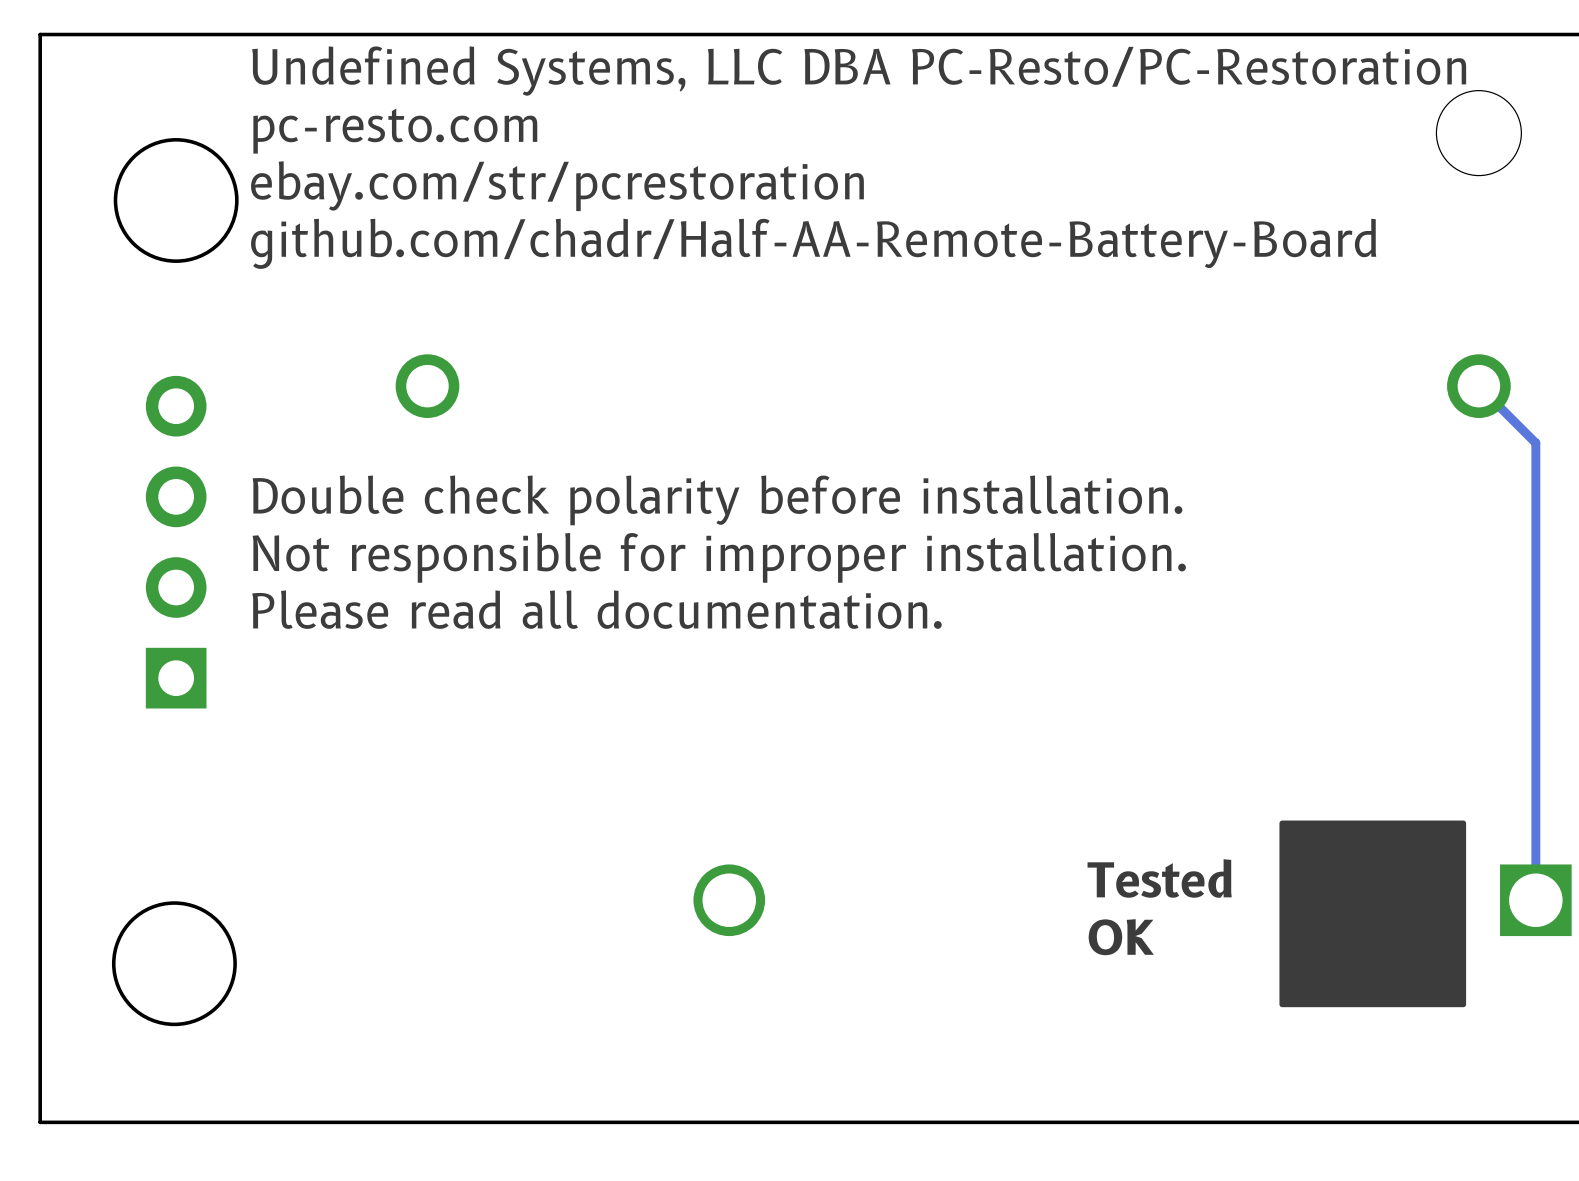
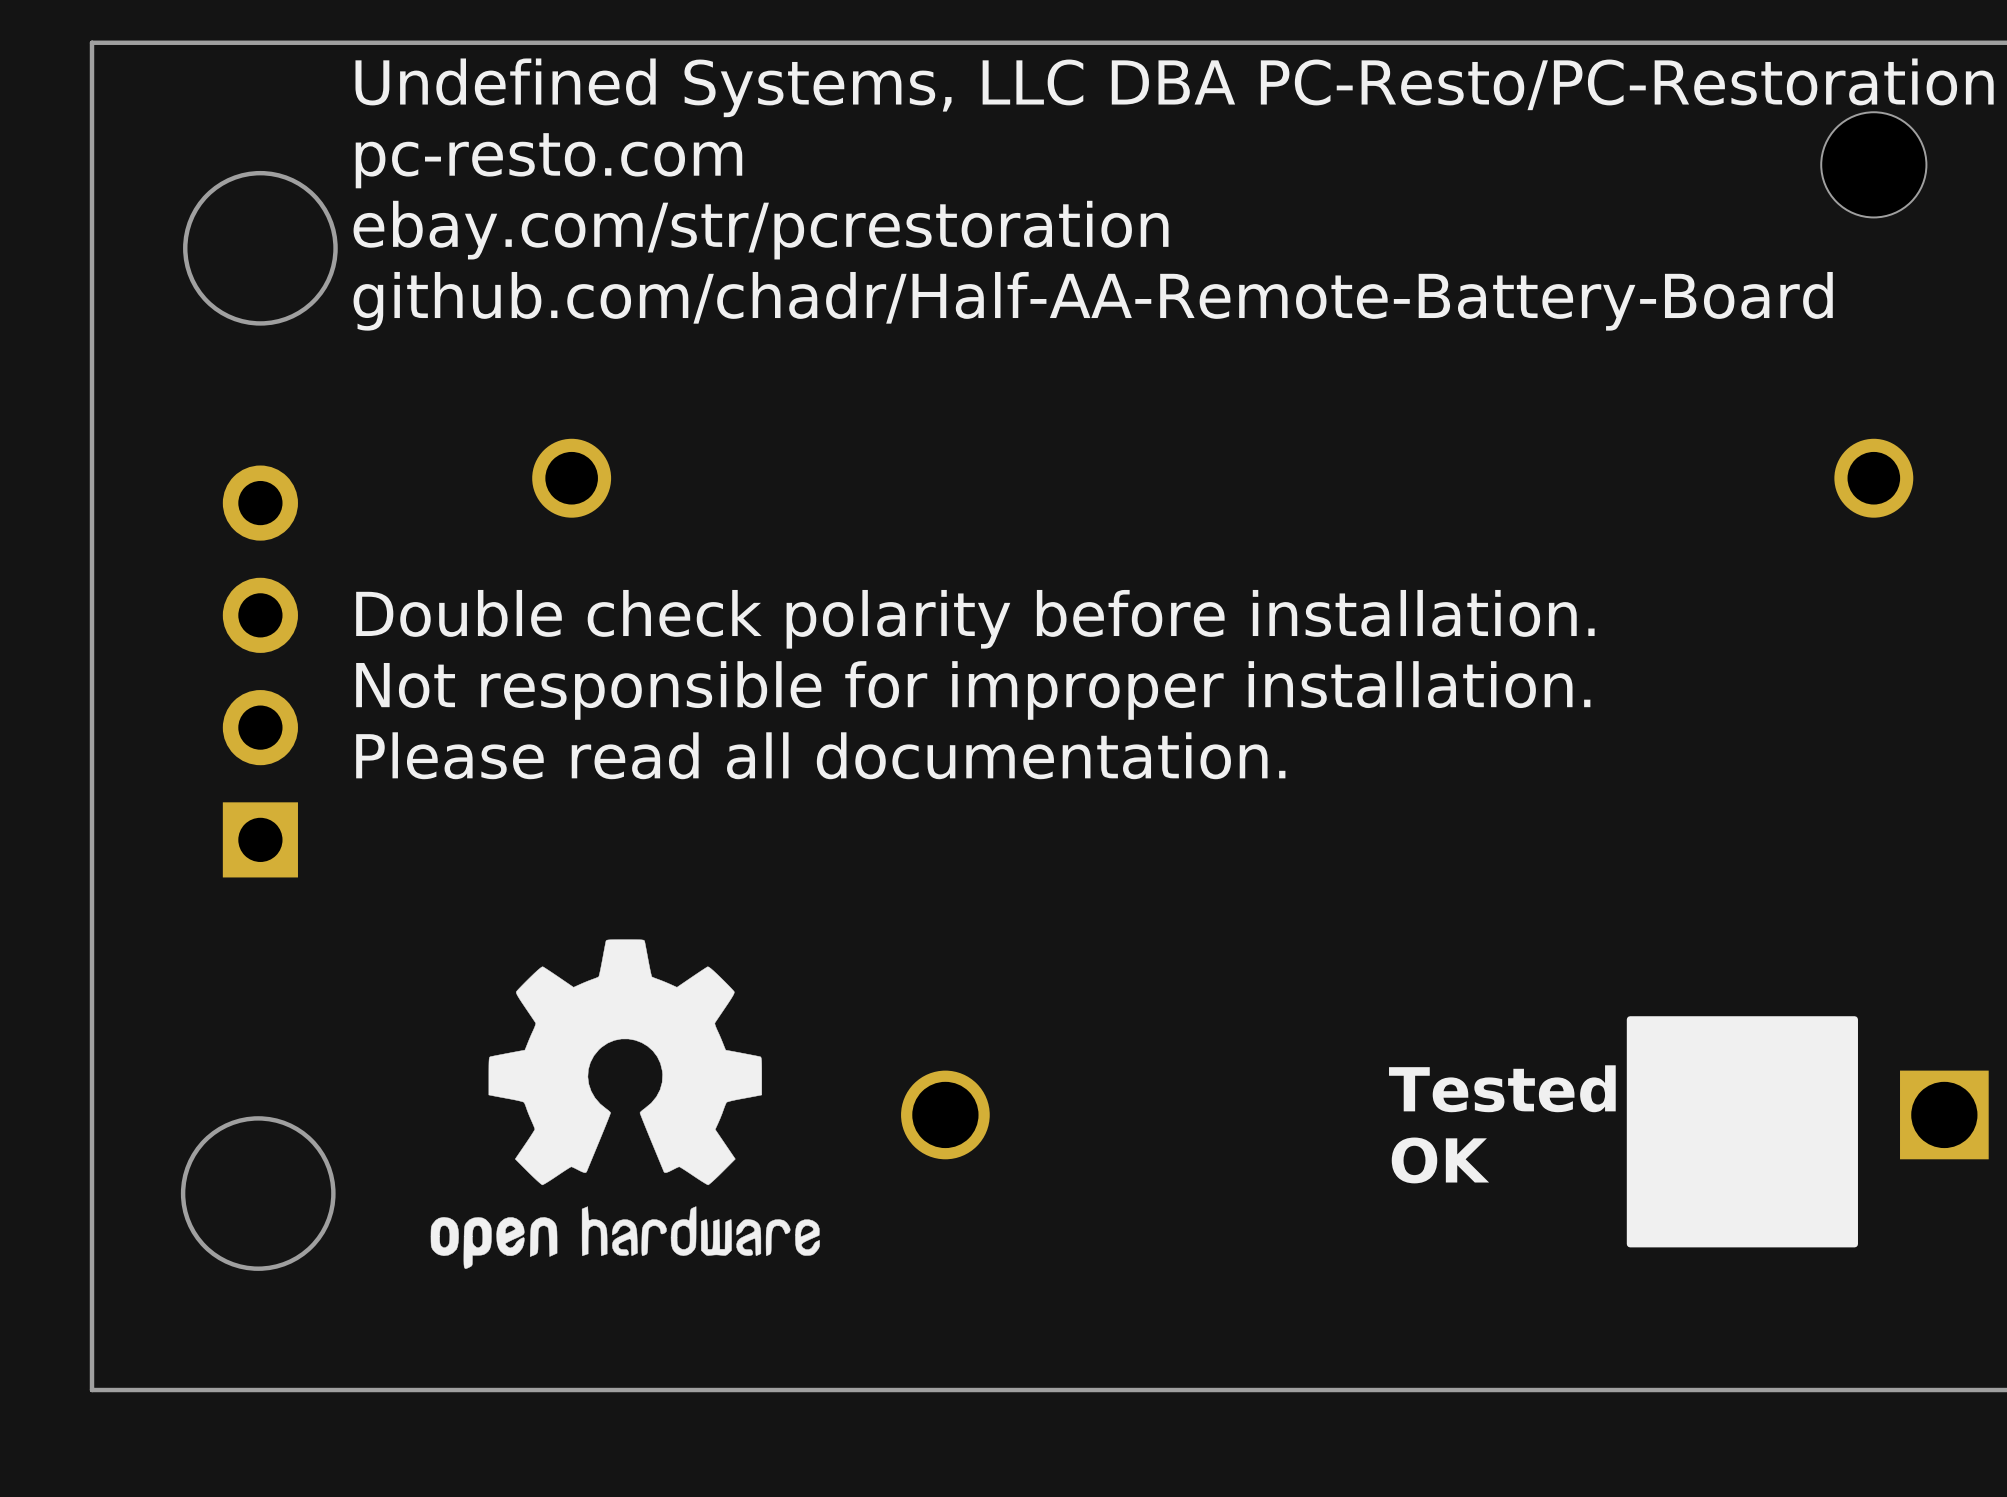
track: (1478, 386) (1535, 443) (1535, 900) -> none
drawing: none -> [430, 939, 820, 1269]

